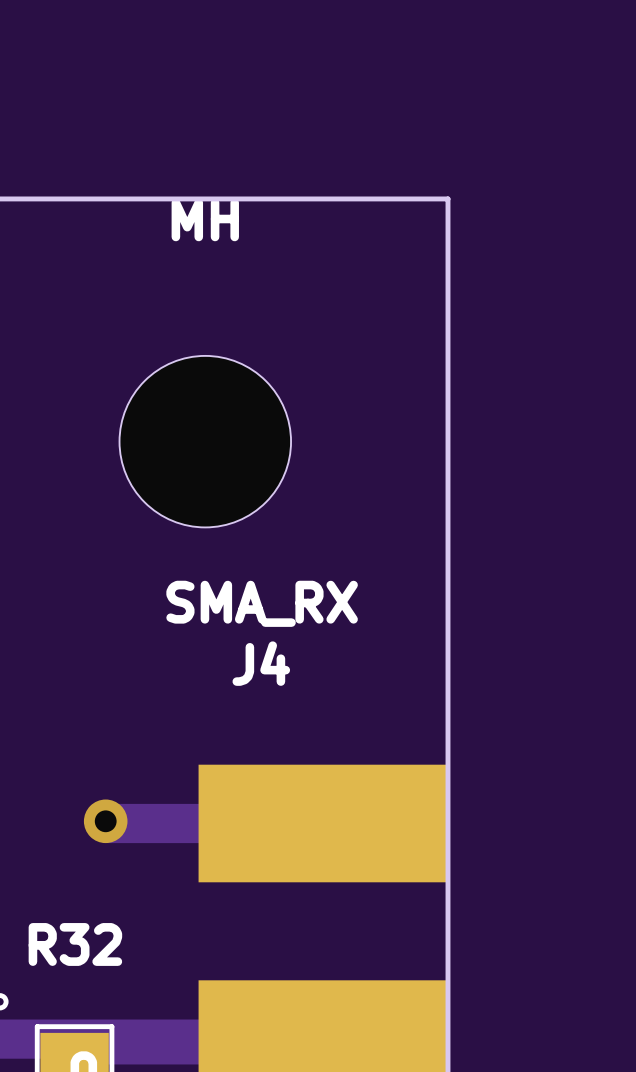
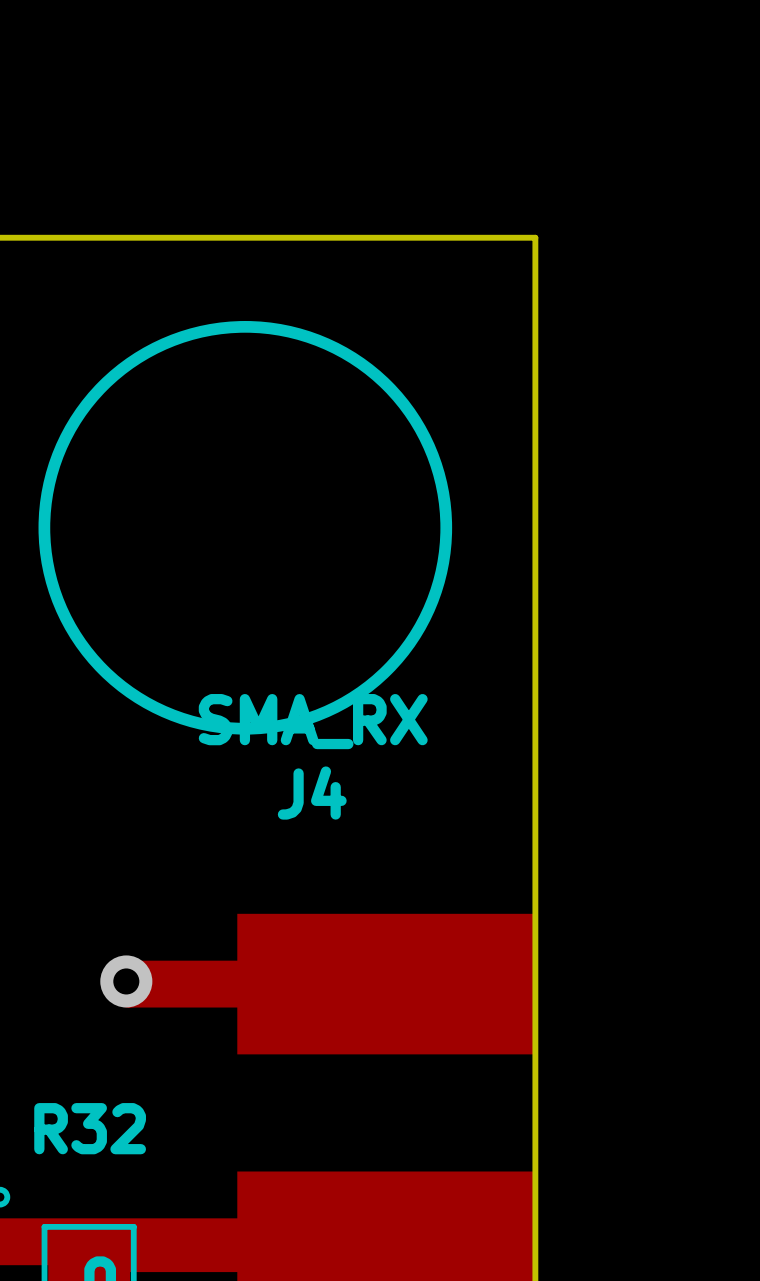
drawing: none -> [38, 321, 453, 735]
MH: (205, 441) -> none

